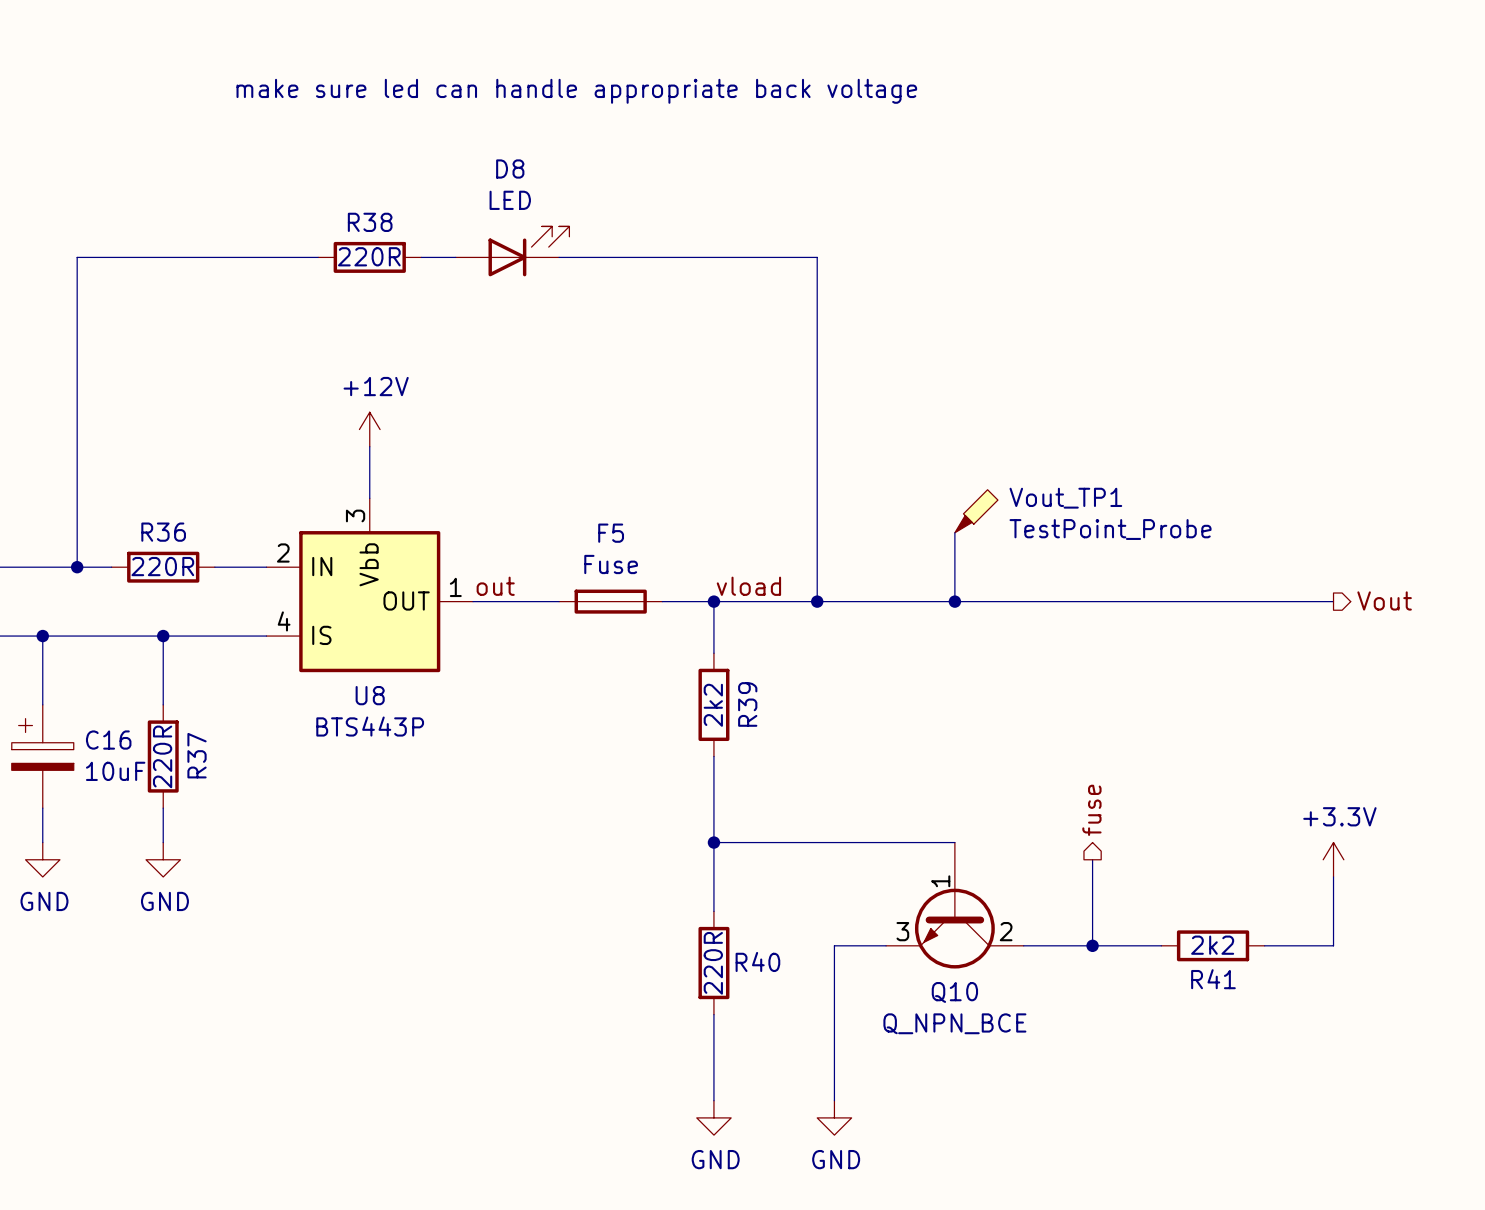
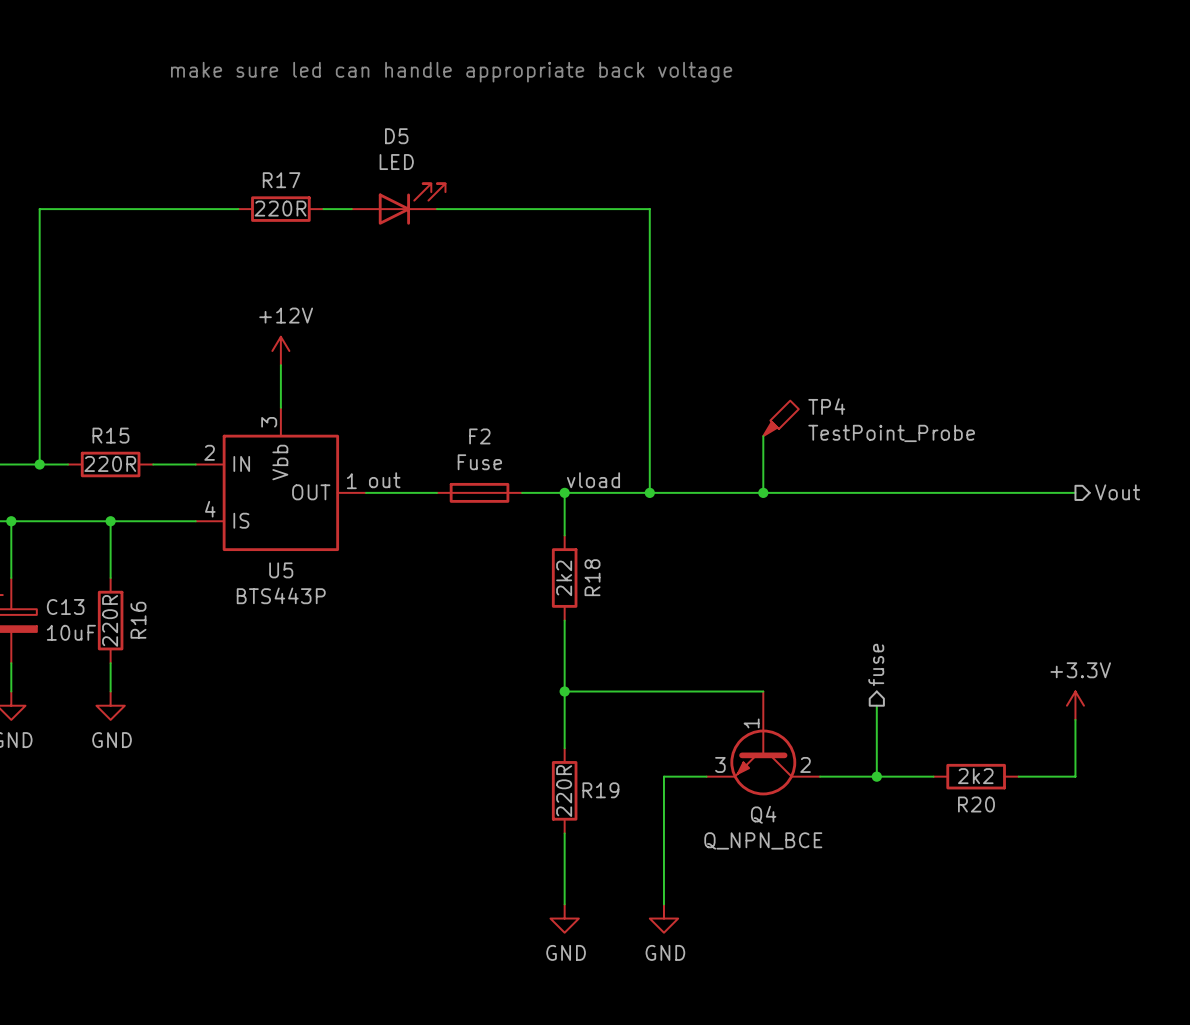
D8 name: D8 (510, 169) -> D5 (396, 136)
R38 name: R38 (370, 222) -> R17 (281, 180)
Vout_TP1 name: Vout_TP1 (1065, 498) -> TP4 (826, 406)
R36 name: R36 (163, 532) -> R15 (110, 435)
F5 name: F5 (611, 533) -> F2 (479, 436)
U8 name: U8 (370, 695) -> U5 (281, 570)
R39 name: R39 (747, 704) -> R18 (592, 577)
C16 name: C16 (108, 740) -> C13 (65, 606)
R37 name: R37 (197, 755) -> R16 (138, 620)
R40 name: R40 (757, 961) -> R19 (600, 790)
R41 name: R41 (1213, 979) -> R20 (976, 804)
Q10 name: Q10 (954, 992) -> Q4 (763, 814)

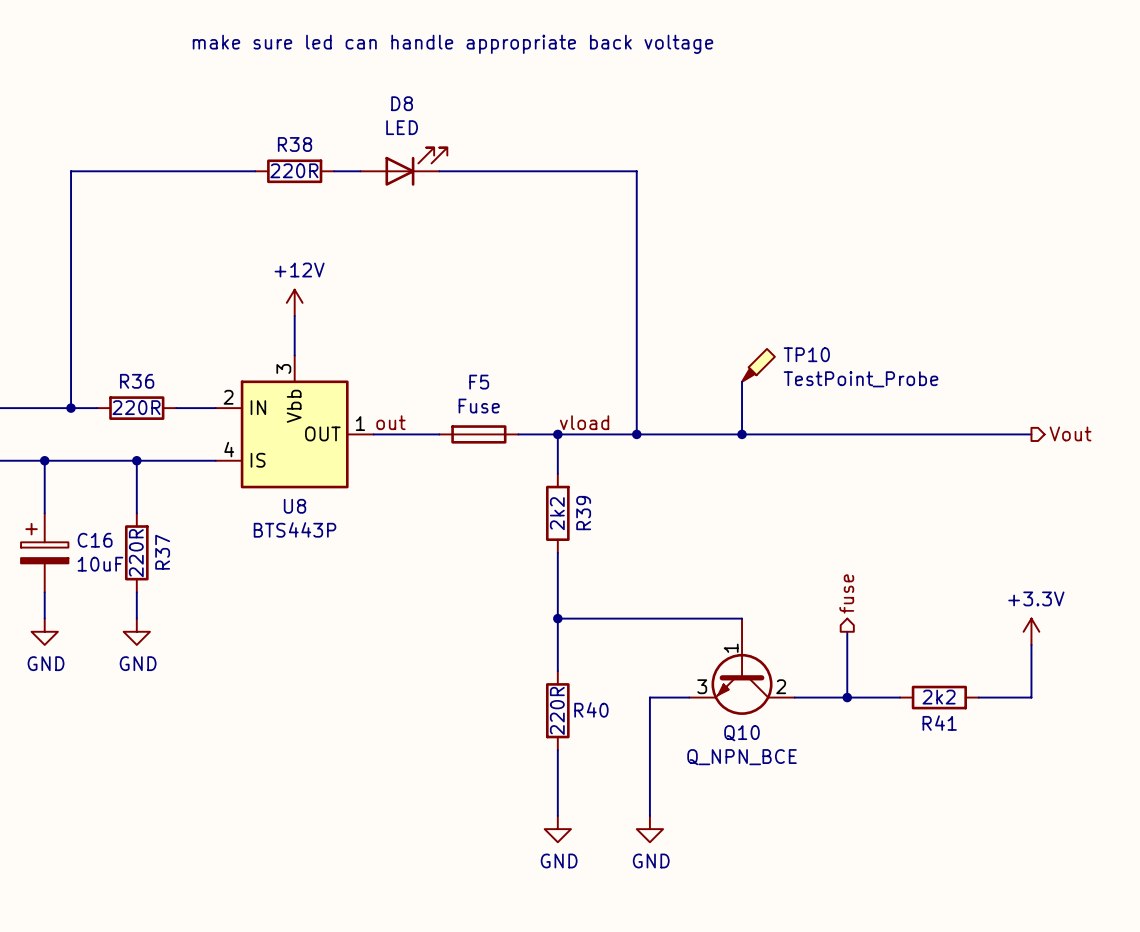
D5 name: D5 (396, 136) -> D8 (402, 103)
R17 name: R17 (281, 180) -> R38 (295, 144)
TP4 name: TP4 (826, 406) -> TP10 (806, 354)
R15 name: R15 (110, 435) -> R36 (137, 381)
F2 name: F2 (479, 436) -> F5 (479, 382)
U5 name: U5 (281, 570) -> U8 (295, 506)
R18 name: R18 (592, 577) -> R39 (583, 513)
C13 name: C13 (65, 606) -> C16 (95, 540)
R16 name: R16 (138, 620) -> R37 (162, 552)
R19 name: R19 (600, 790) -> R40 (591, 709)
R20 name: R20 (976, 804) -> R41 (939, 723)
Q4 name: Q4 (763, 814) -> Q10 (742, 733)

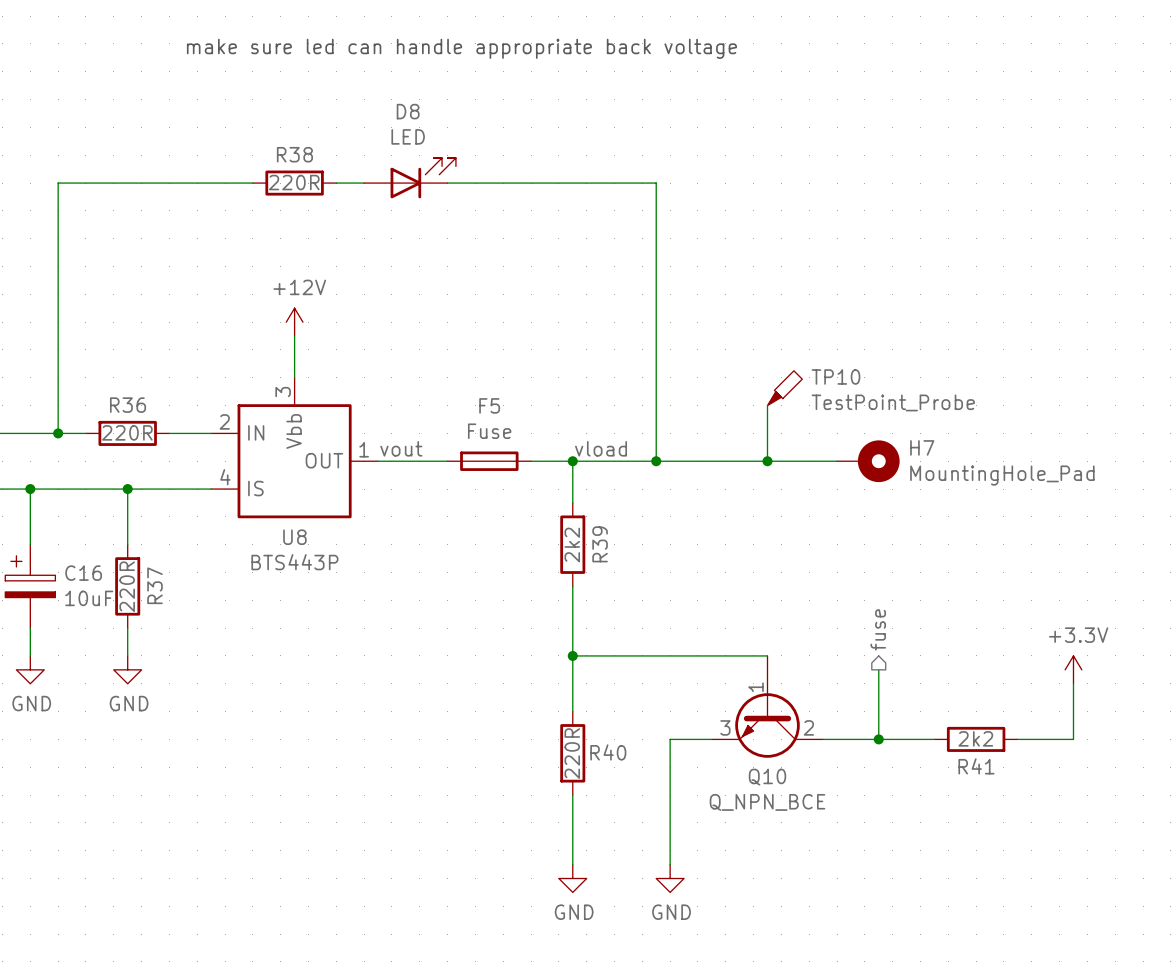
label: out (390, 422) -> vout (401, 448)
hierarchical label: Vout (1070, 433) -> none
wire: (807, 434) (1031, 434) -> none
H7: none -> MountingHole_Pad (868, 461)

